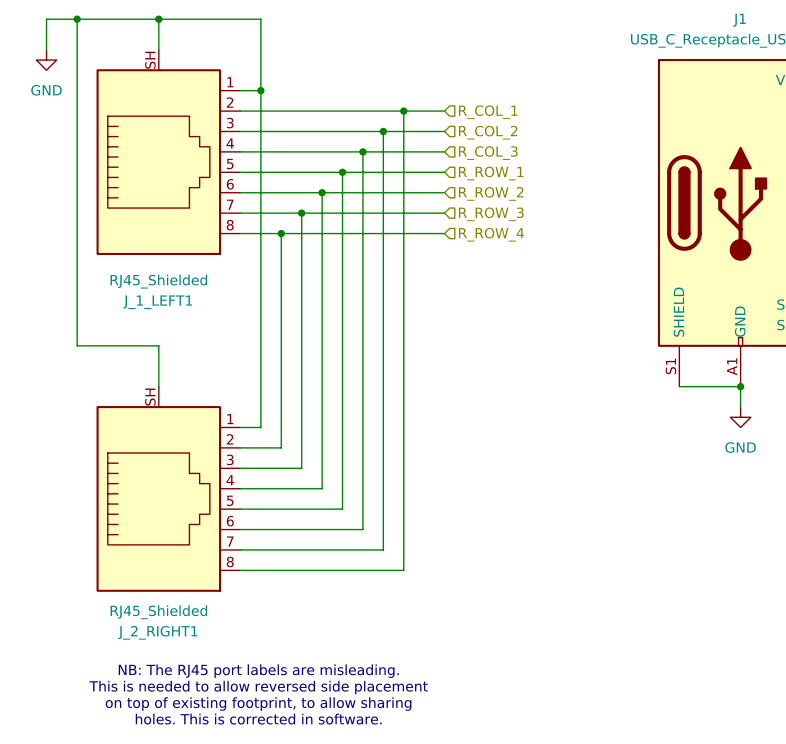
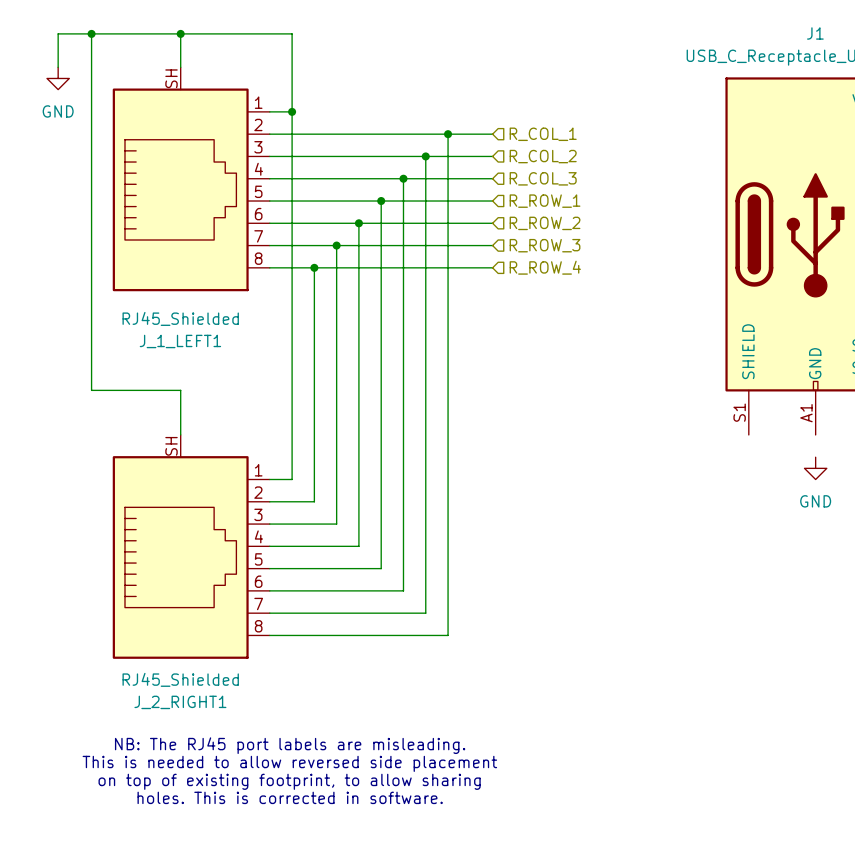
wire: (679, 386) (740, 386) (740, 407) -> none
junction: (740, 386) -> none

